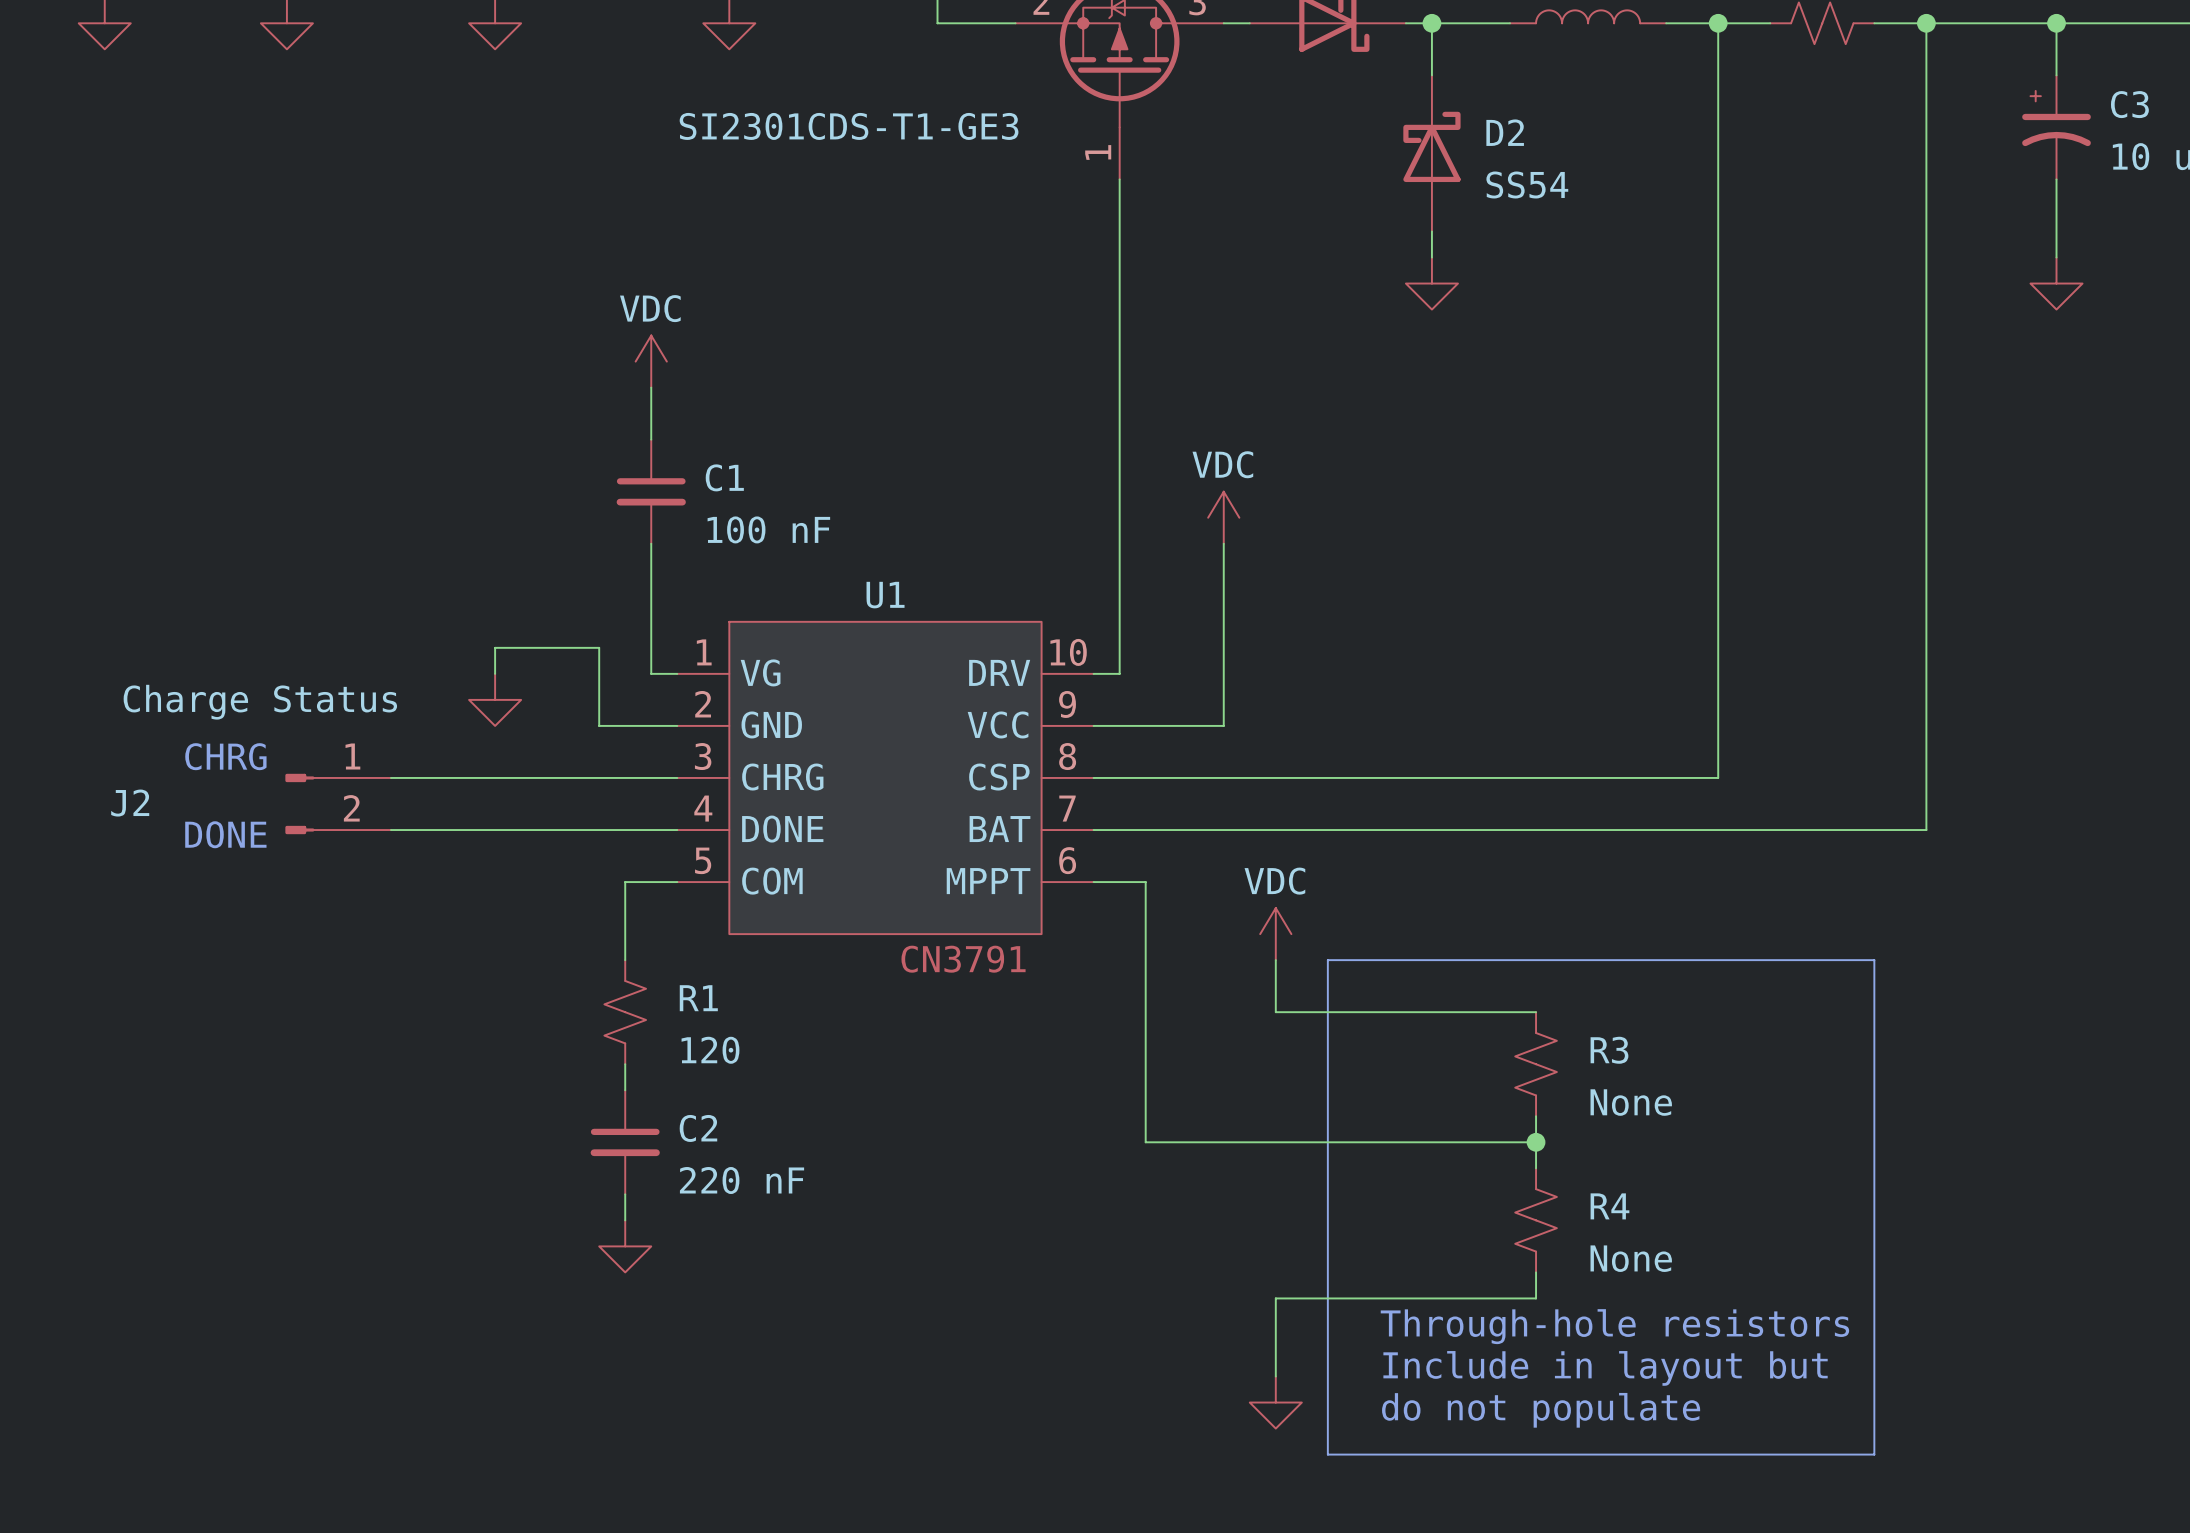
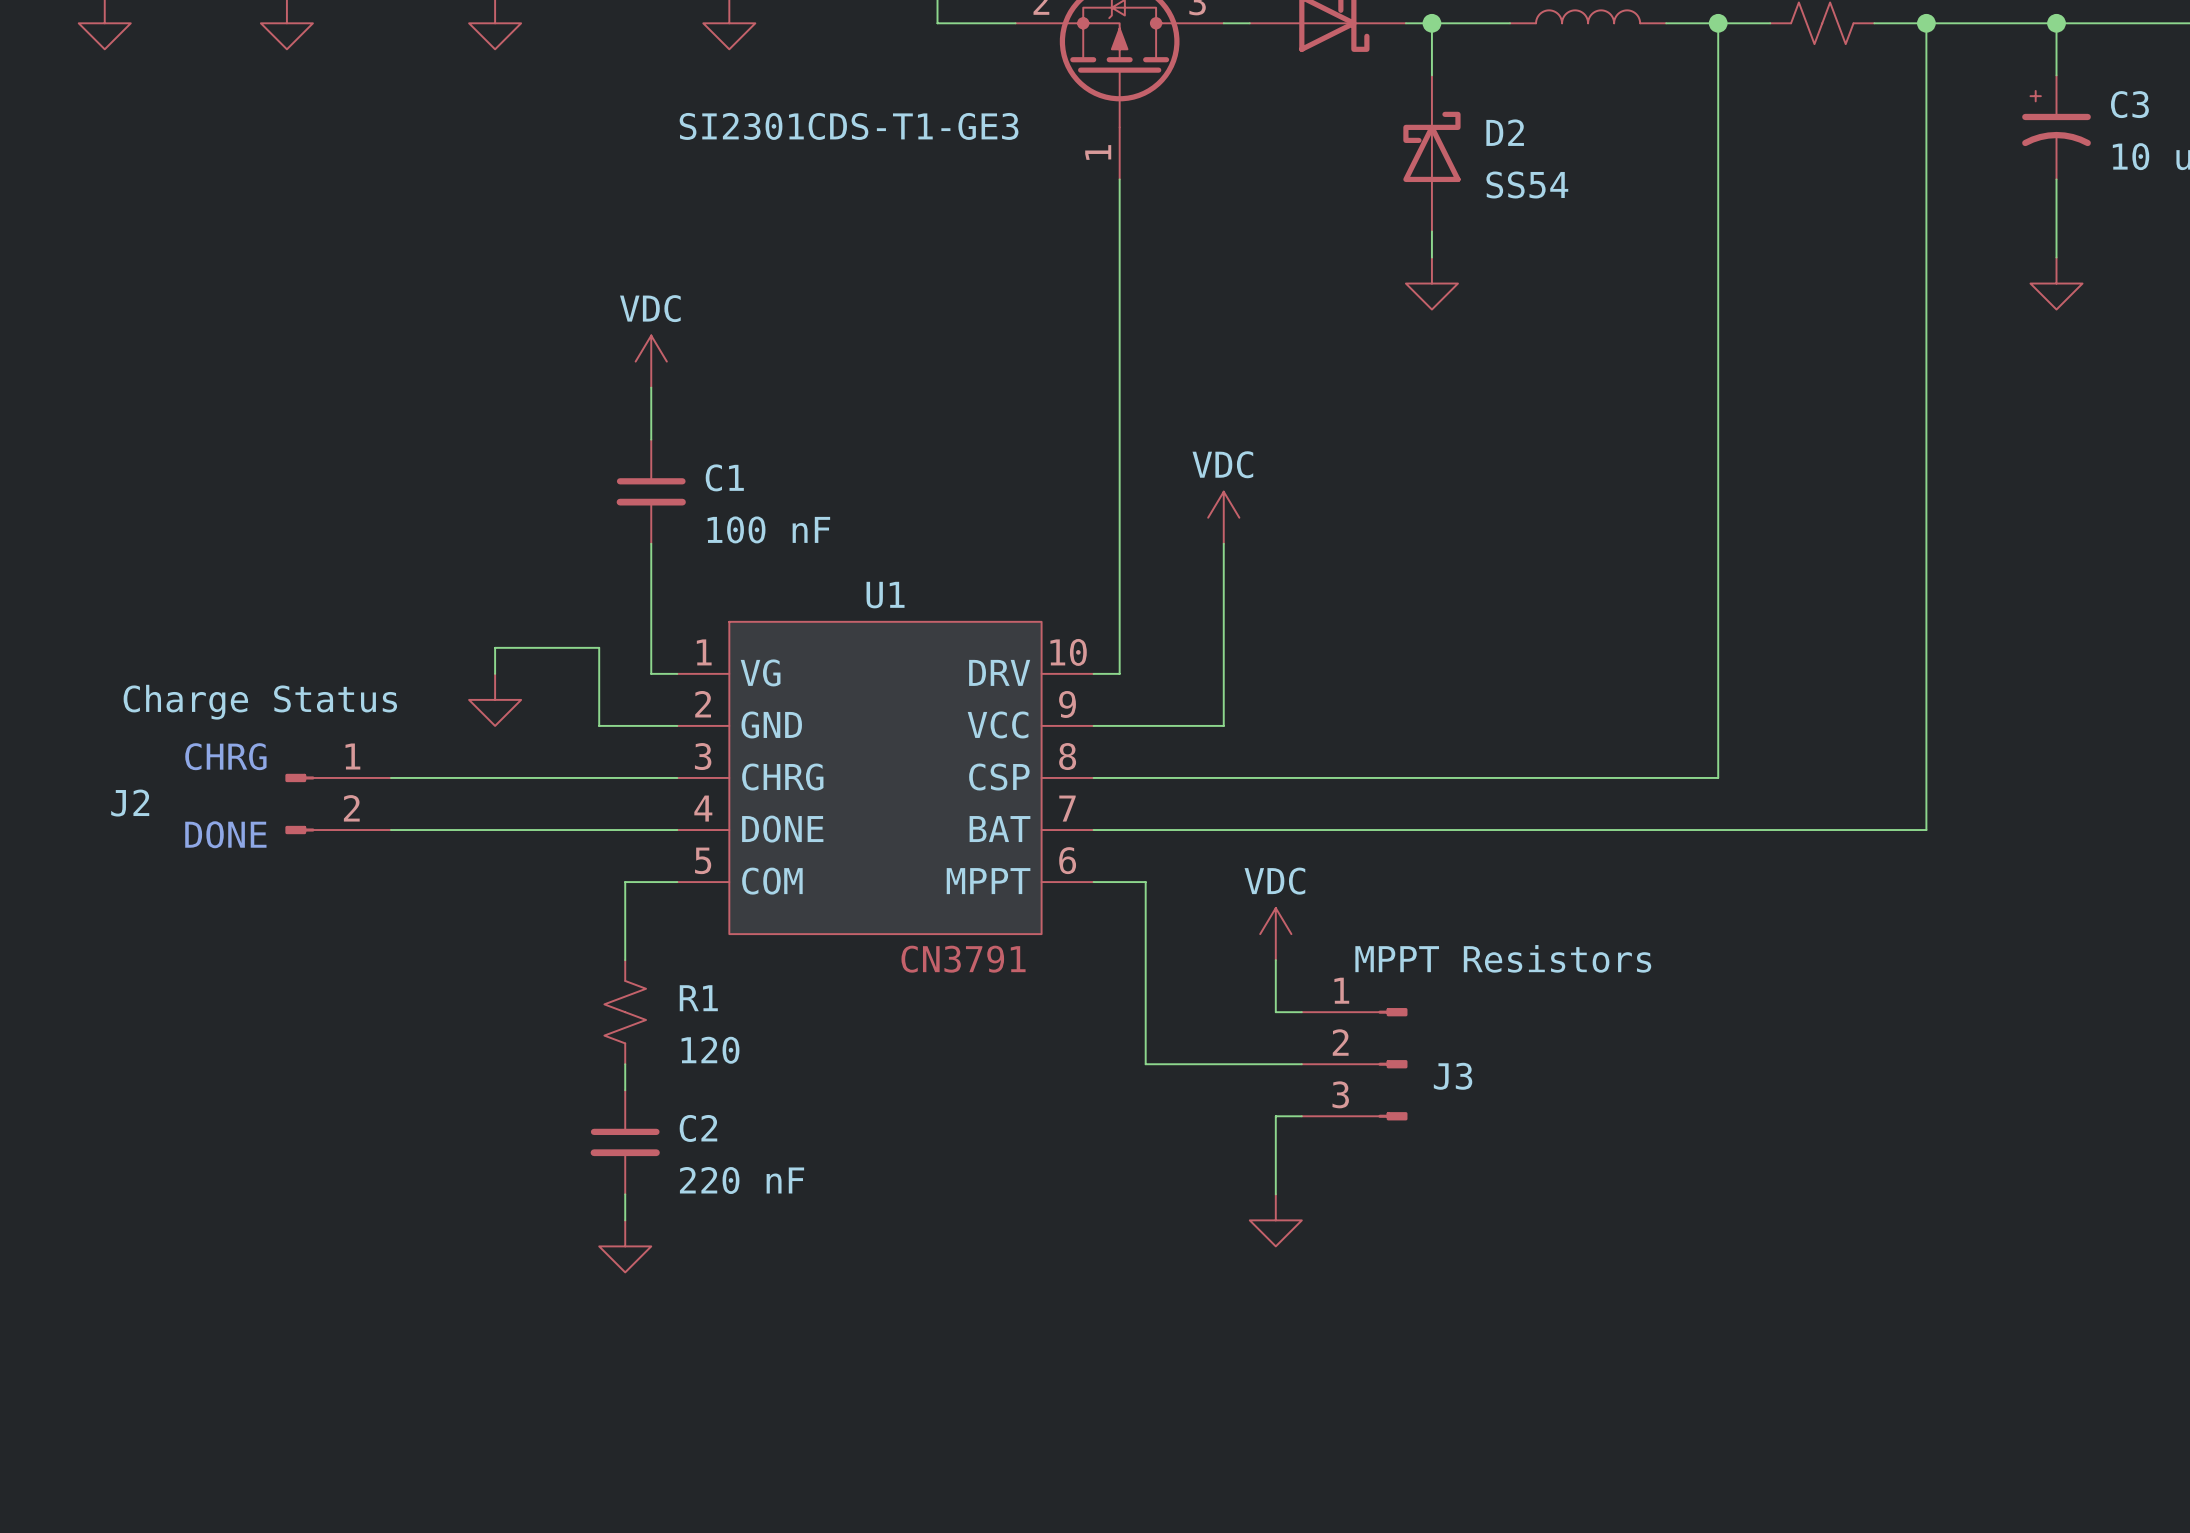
line: (1327, 960) (1874, 960) (1874, 1454) (1327, 1454) (1327, 960) -> none
wire: (1301, 1012) (1536, 1012) -> none
wire: (1145, 1064) (1145, 1142) (1536, 1142) -> (1145, 1064) (1301, 1064)
J3: none -> MPPT Resistors (1354, 1064)
R3: None (1536, 1064) -> none
wire: none -> (1301, 1116) (1275, 1116) (1275, 1194)
wire: (1536, 1116) (1536, 1168) -> none
junction: (1536, 1142) -> none
R4: None (1536, 1220) -> none
wire: (1536, 1272) (1536, 1298) (1275, 1298) (1275, 1376) -> none
text: Through-hole resistors (1614, 1326) -> none
text: Include in layout but (1605, 1368) -> none
power symbol position: (1275, 1402) -> (1275, 1220)
text: do not populate (1541, 1410) -> none

